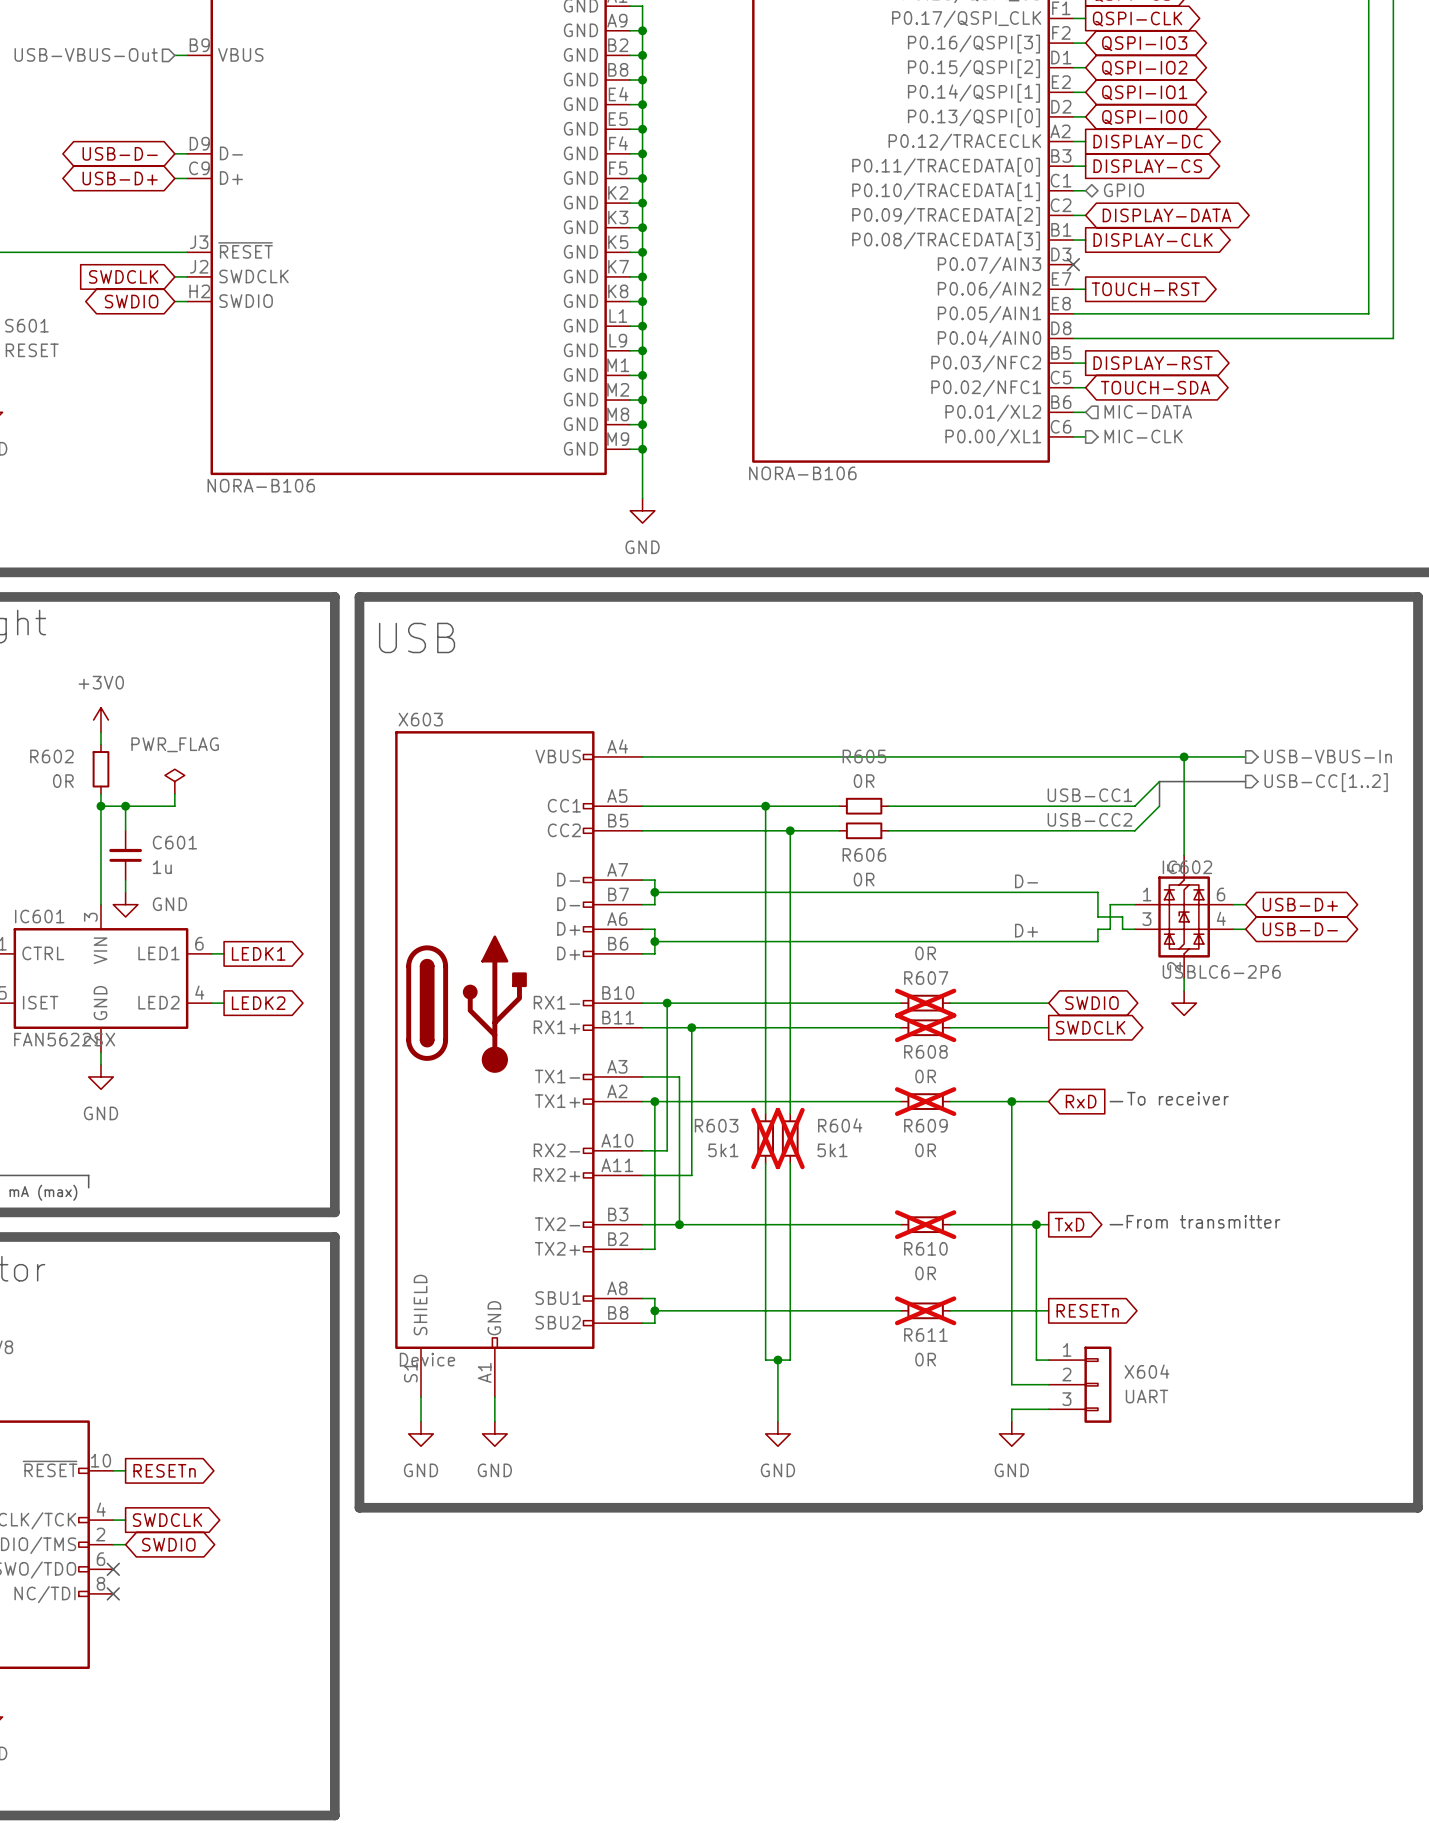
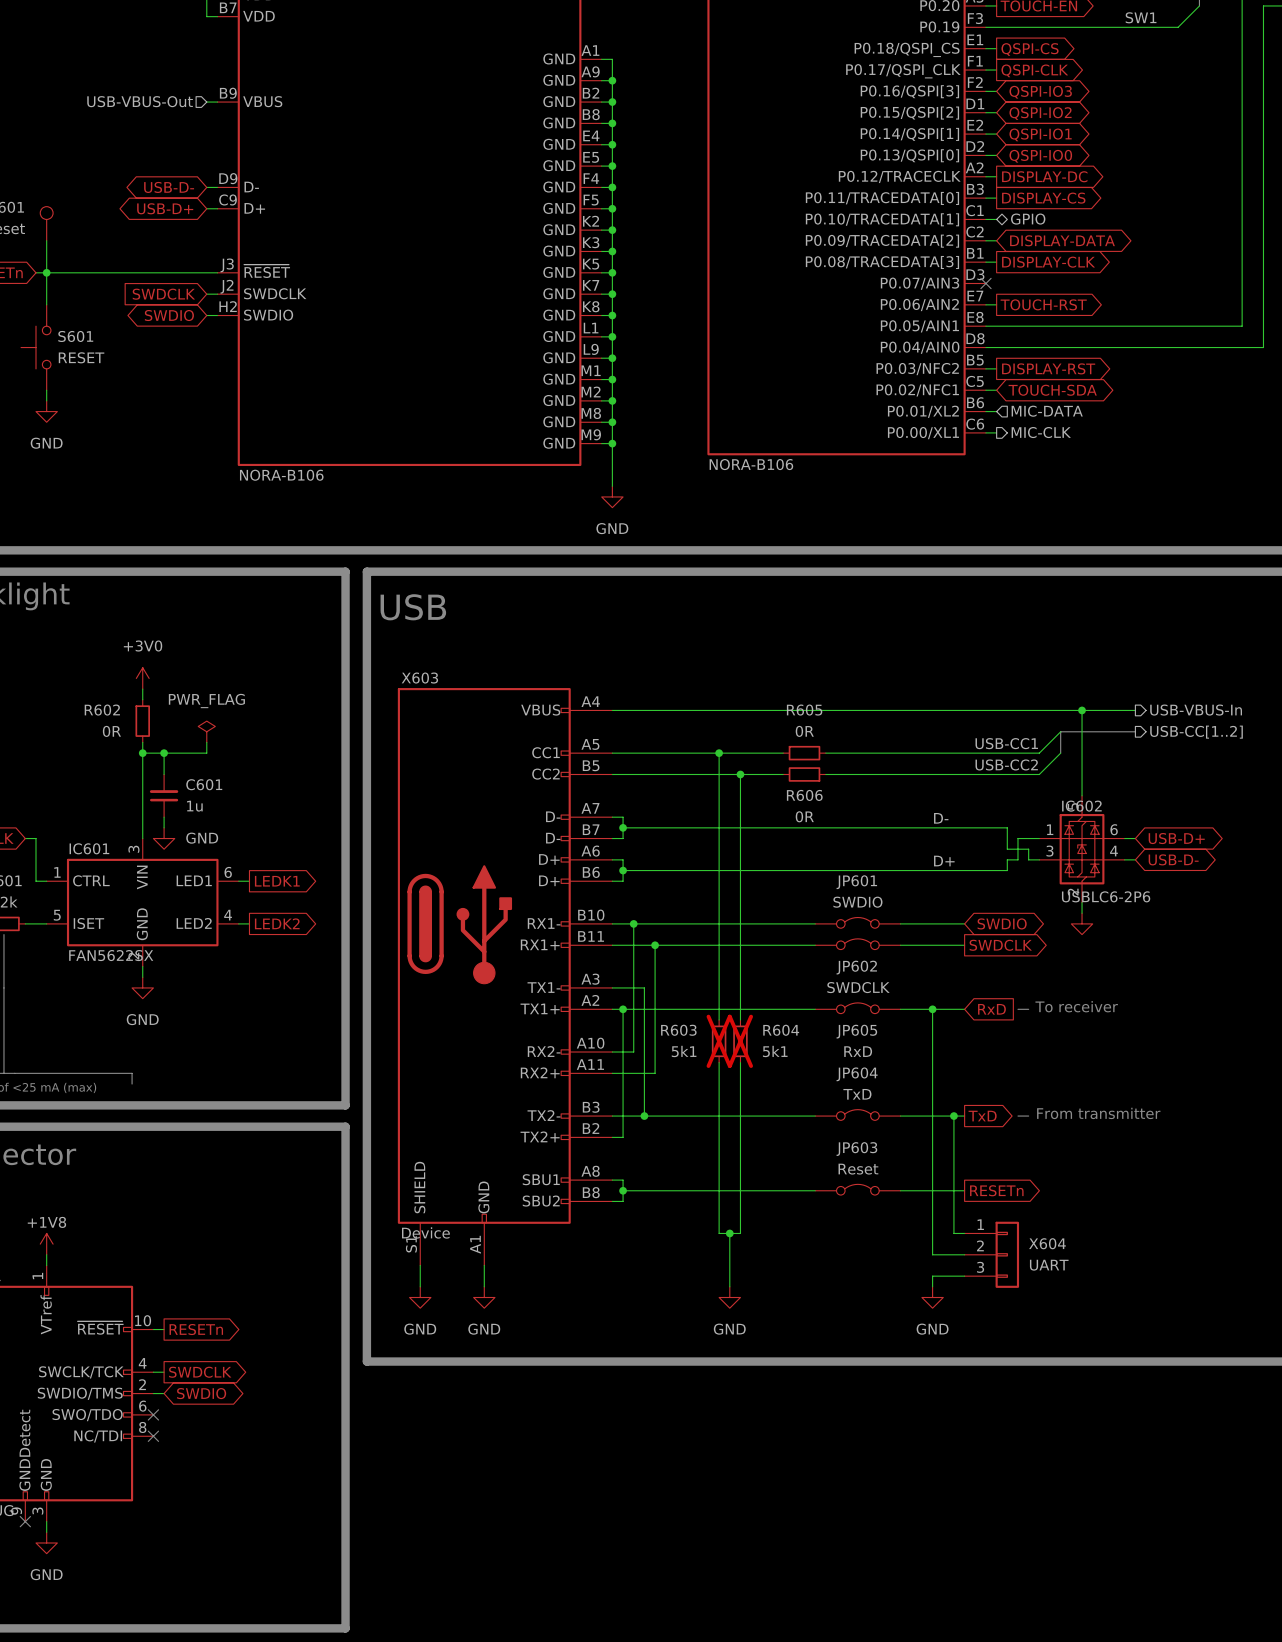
JP601: none -> SWDIO (857, 922)
R607: 0R (925, 1003) -> none
JP602: none -> SWDCLK (857, 944)
R608: 0R (925, 1027) -> none
JP605: none -> RxD (857, 1008)
R609: 0R (925, 1101) -> none
JP604: none -> TxD (857, 1114)
R610: 0R (925, 1224) -> none
JP603: none -> Reset (857, 1189)
R611: 0R (925, 1310) -> none

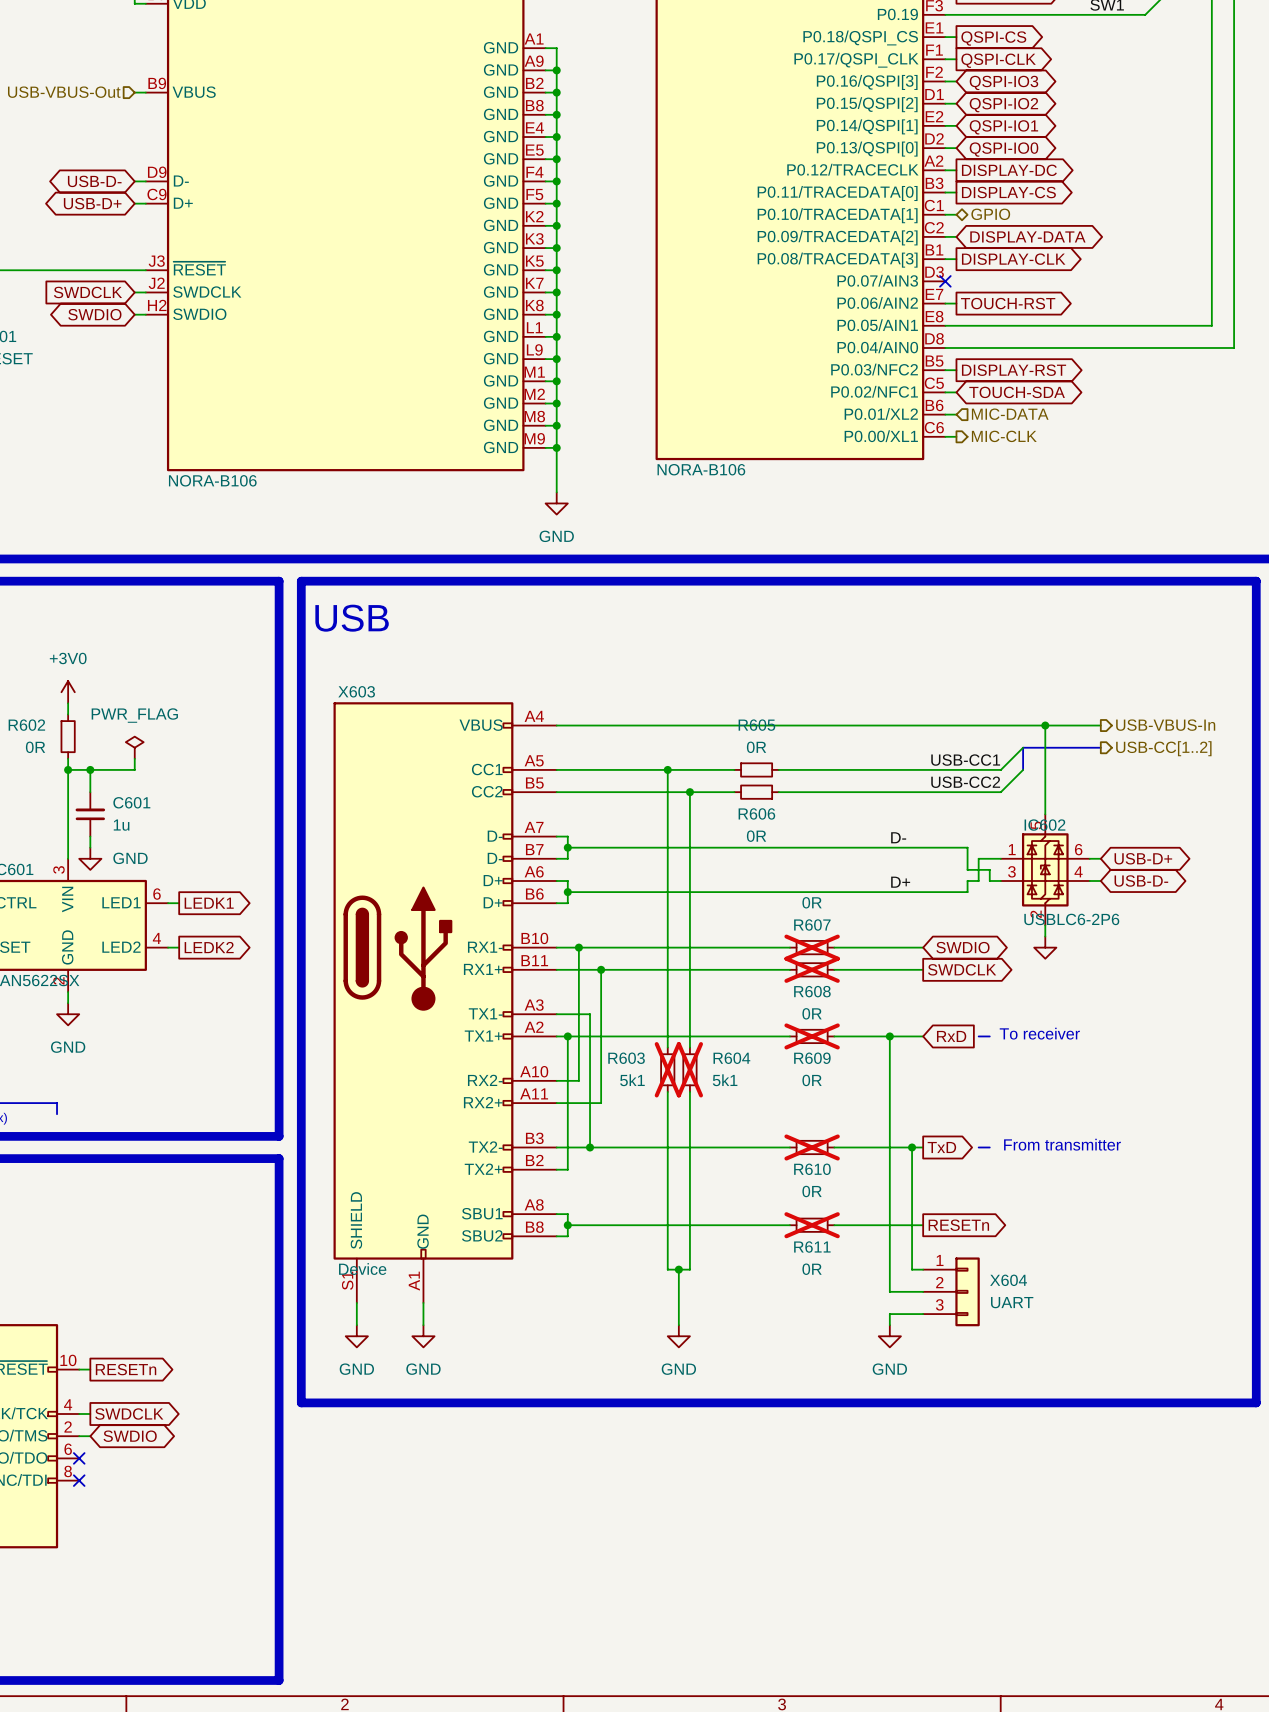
JP601: SWDIO (857, 922) -> none
R607: none -> 0R (812, 947)
JP602: SWDCLK (857, 944) -> none
R608: none -> 0R (812, 969)
JP605: RxD (857, 1008) -> none
R609: none -> 0R (812, 1036)
JP604: TxD (857, 1114) -> none
R610: none -> 0R (812, 1147)
JP603: Reset (857, 1189) -> none
R611: none -> 0R (812, 1225)

